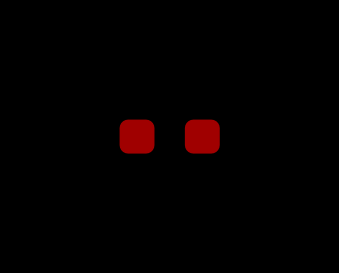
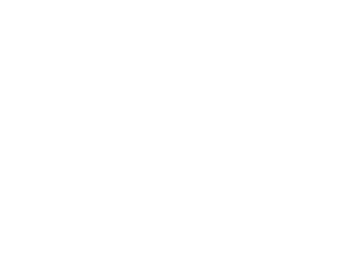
part: (169, 136) -> none

